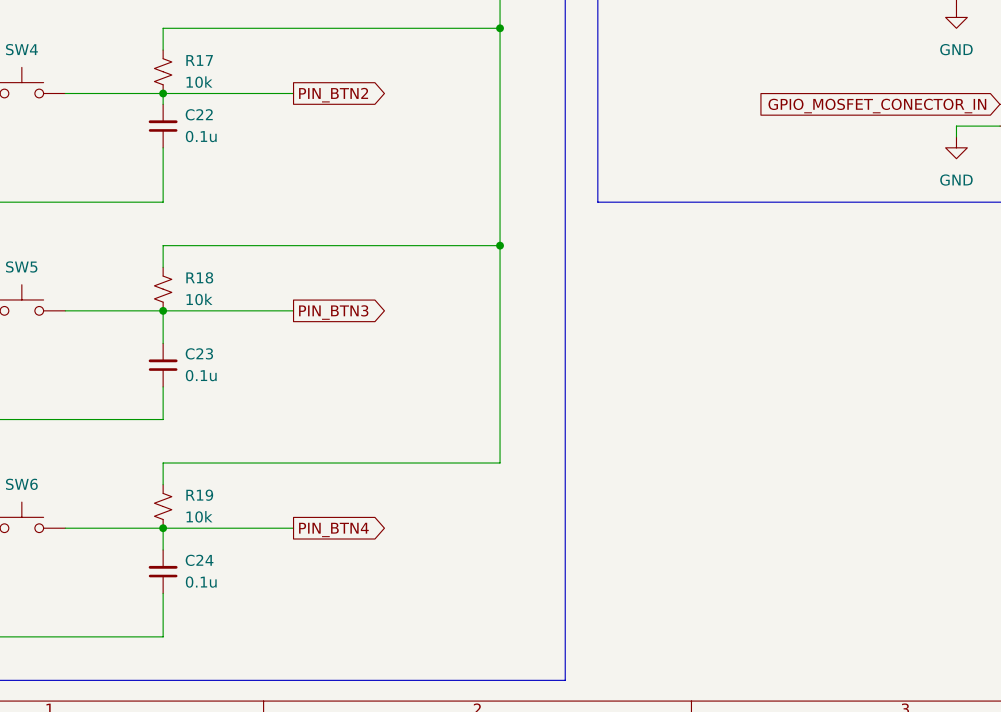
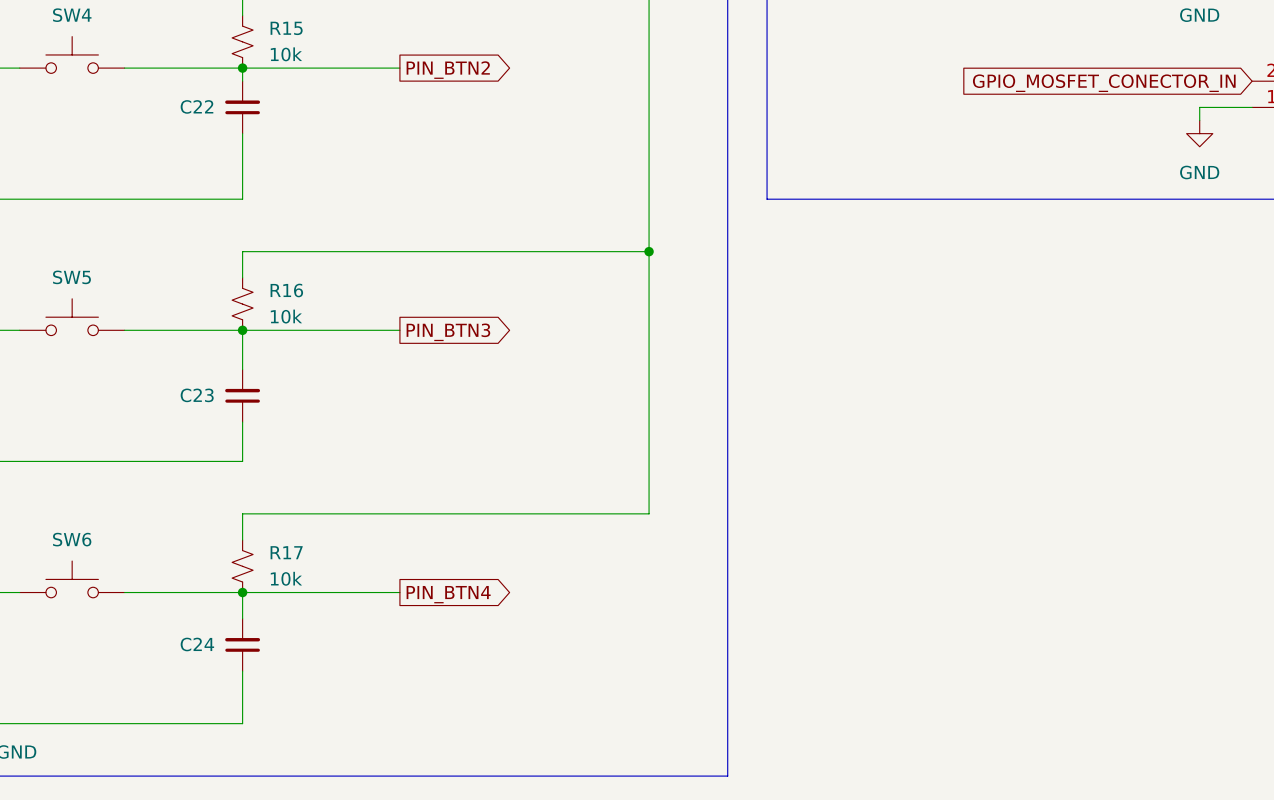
R17 name: R17 (199, 60) -> R15 (286, 28)
C22 name position: C22 (199, 114) -> C22 (196, 106)
C22 value: 0.1u (201, 136) -> none
R18 name: R18 (199, 277) -> R16 (286, 290)
C23 name position: C23 (199, 353) -> C23 (197, 395)
C23 value: 0.1u (201, 375) -> none
R19 name: R19 (199, 495) -> R17 (286, 552)
C24 name position: C24 (199, 560) -> C24 (197, 644)
C24 value: 0.1u (201, 582) -> none

